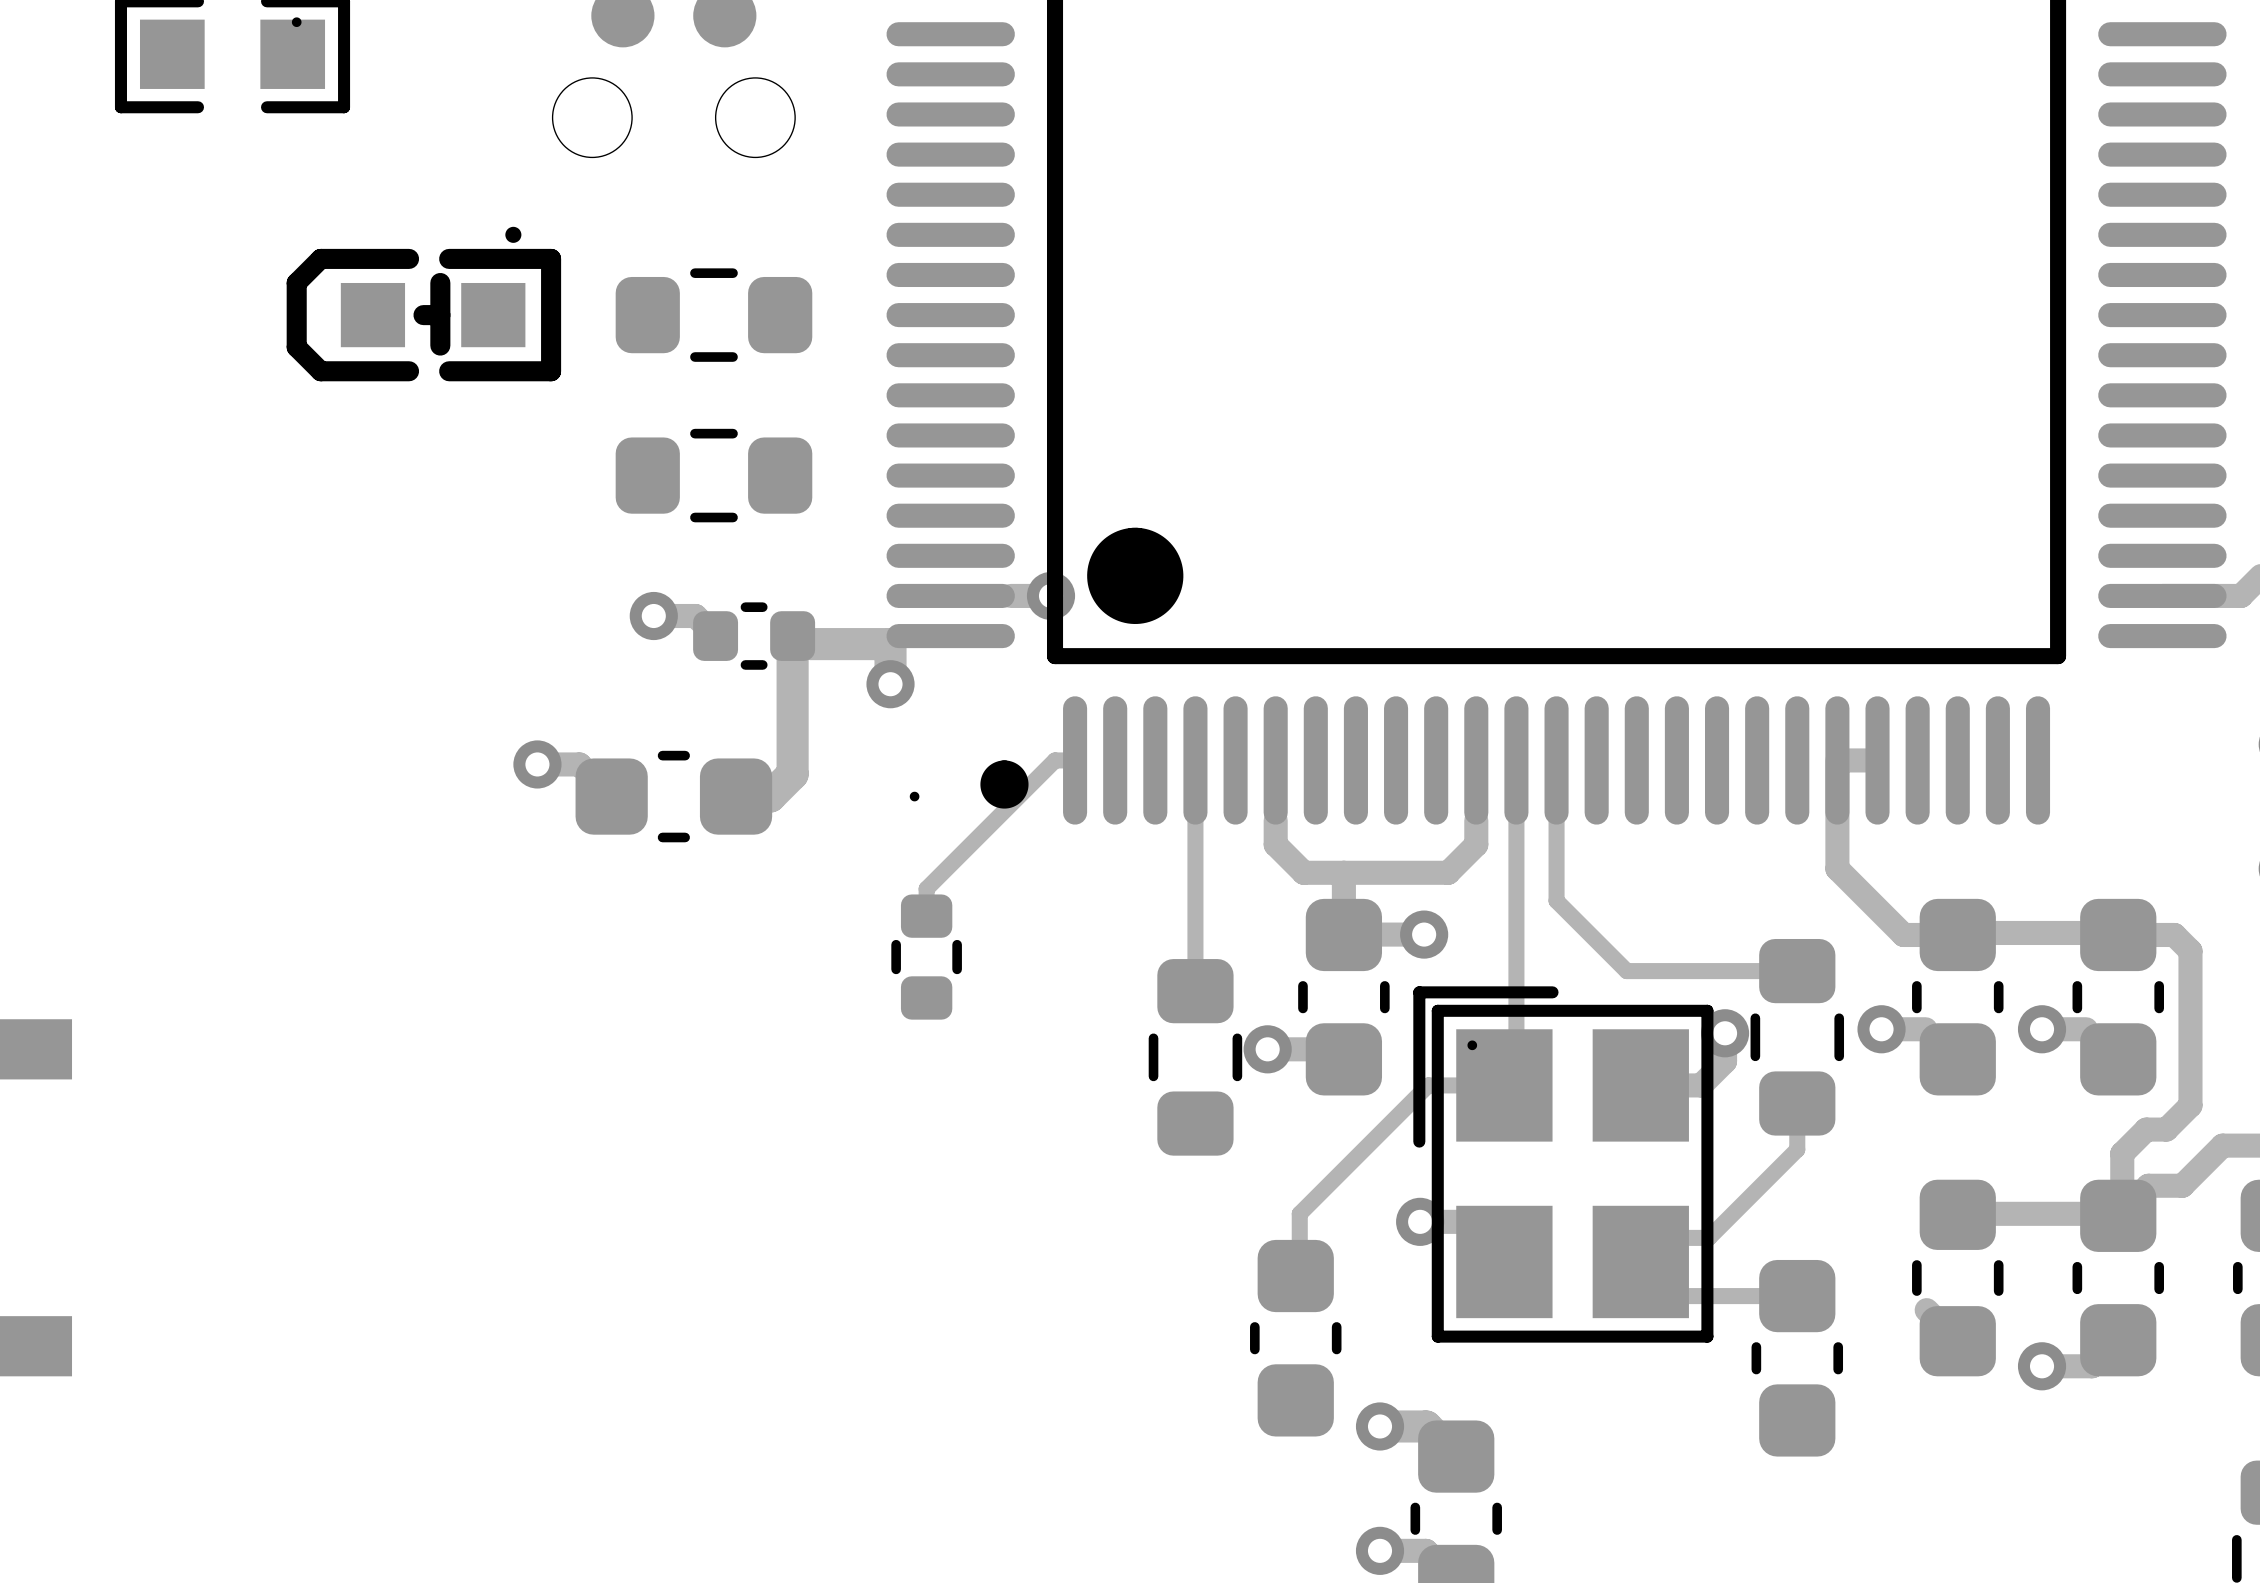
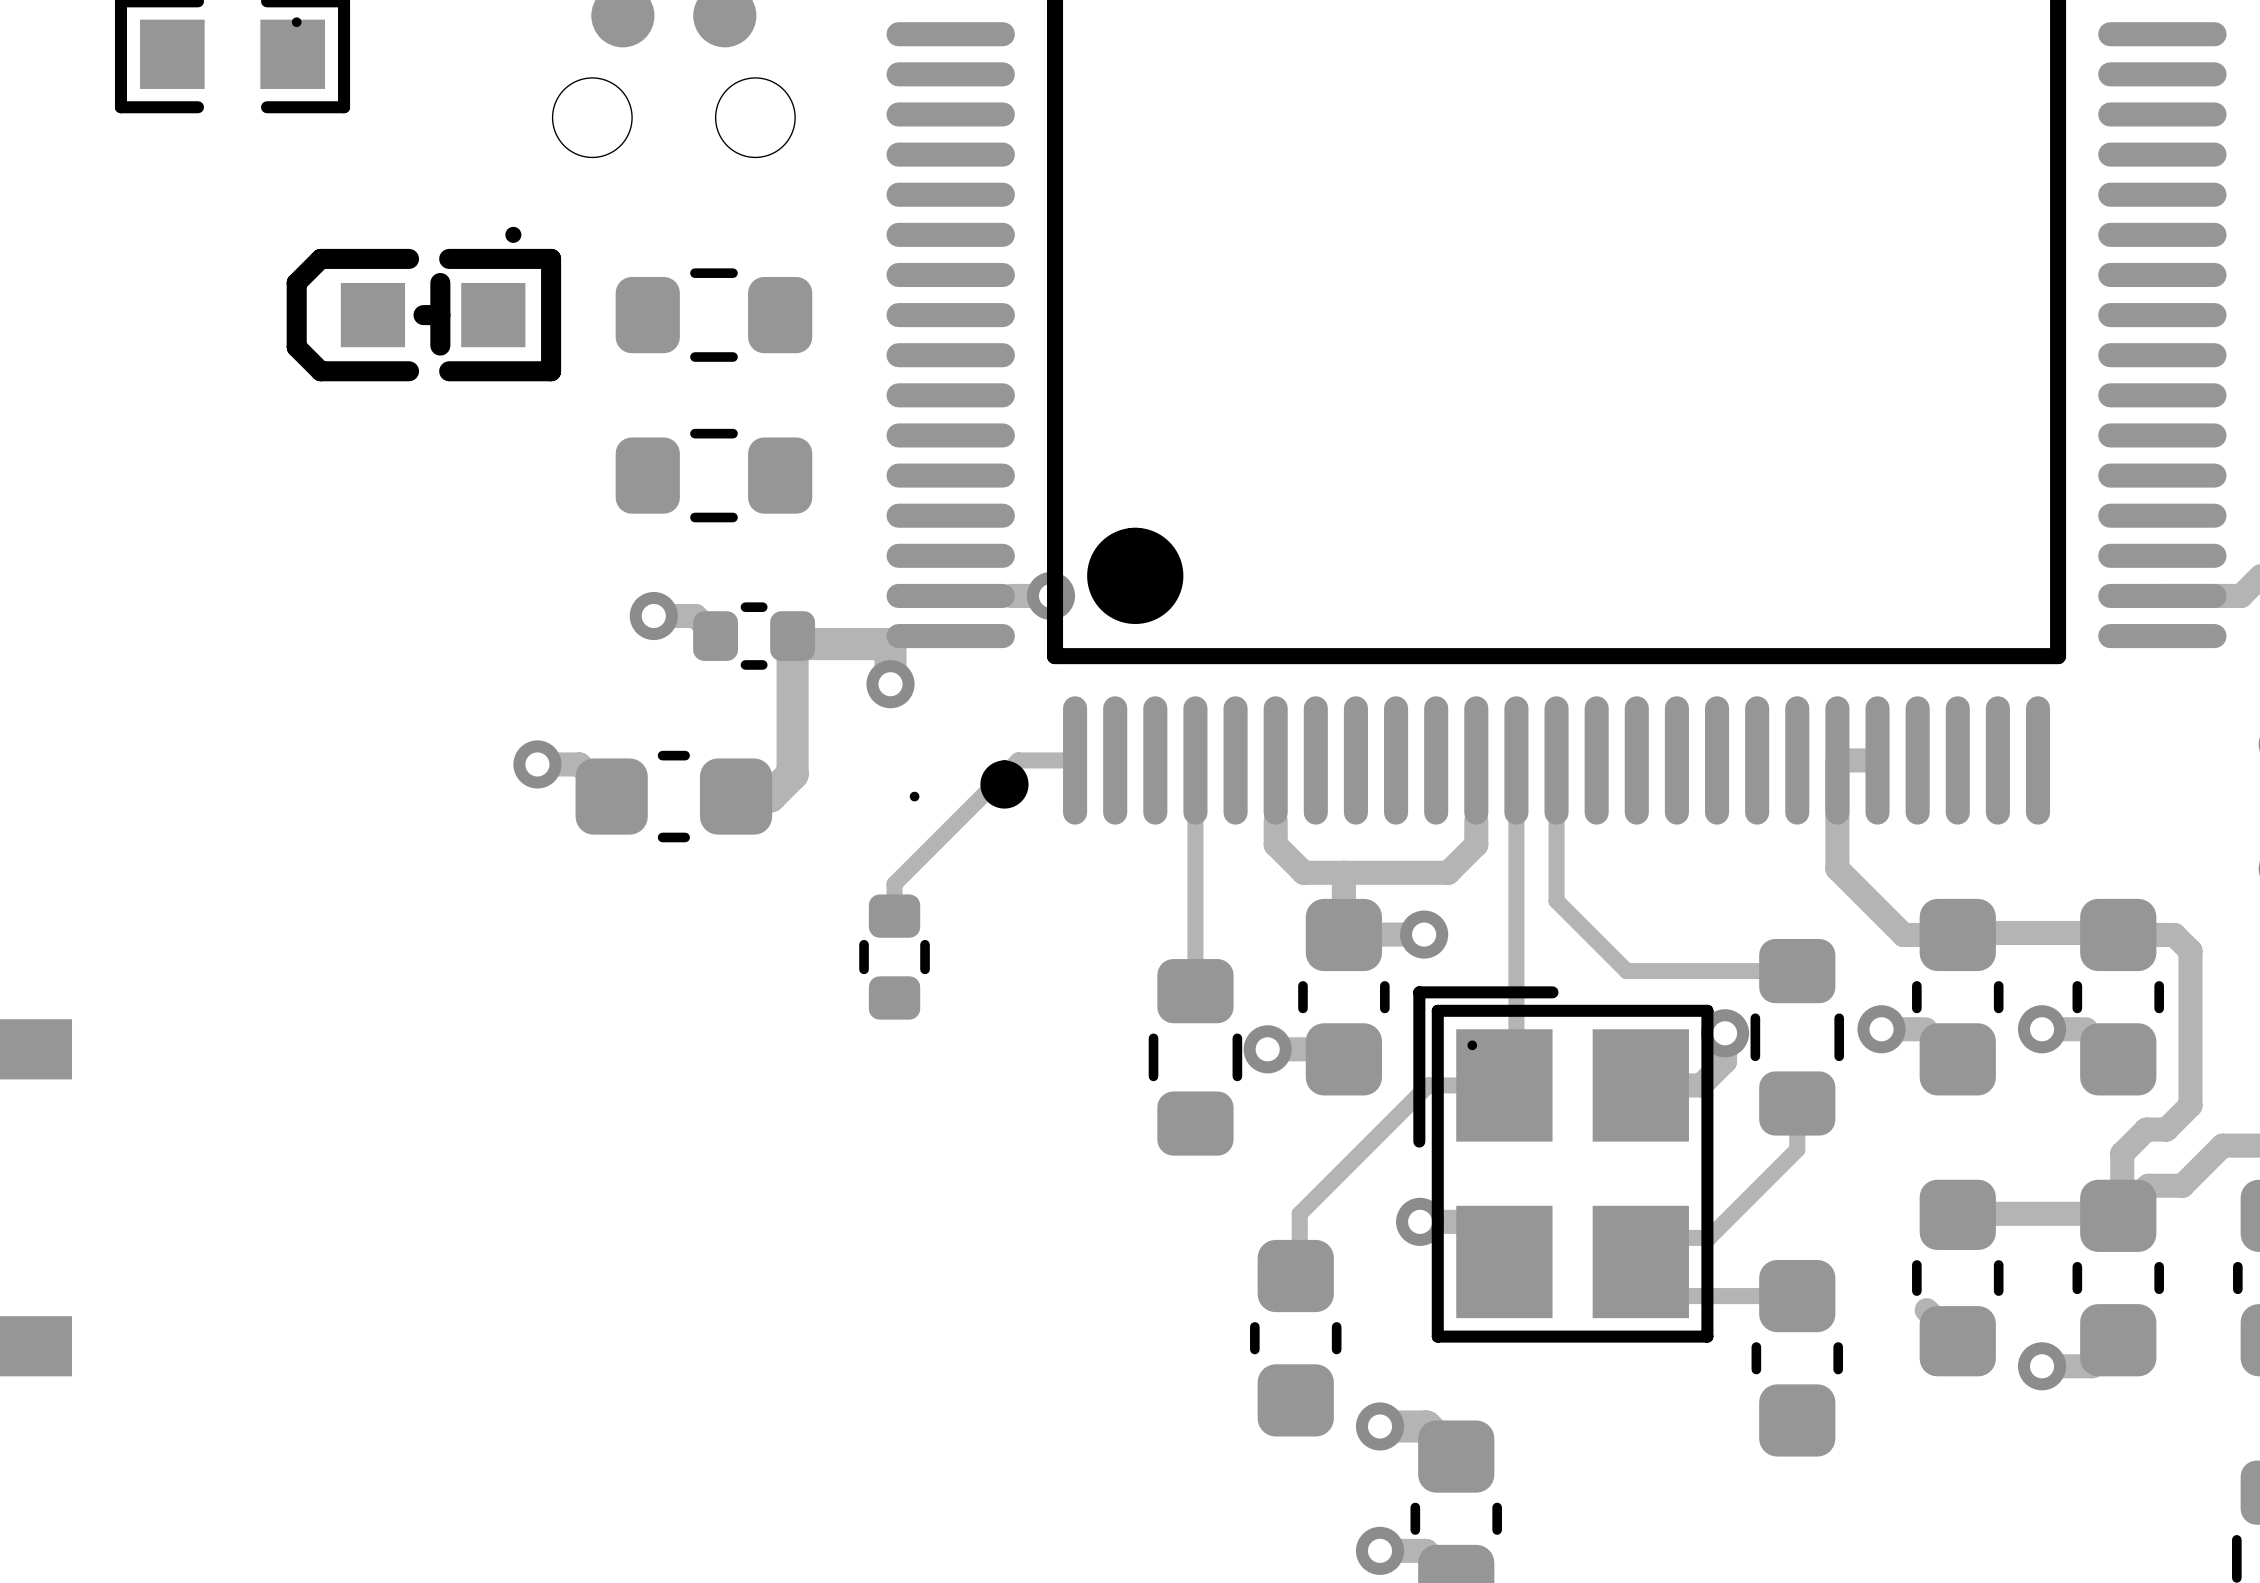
track: (1055, 760) (926, 888) (926, 916) -> (1055, 760) (1018, 760) (894, 884) (894, 916)
part position: (926, 957) -> (894, 957)

